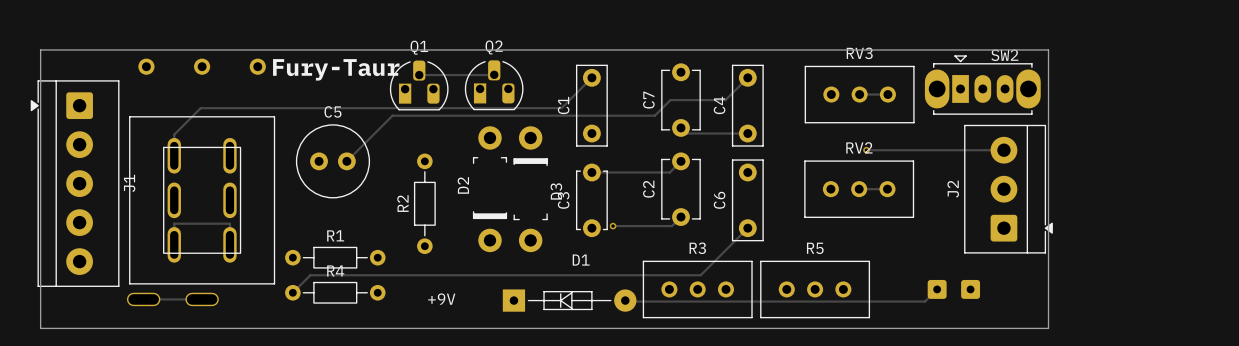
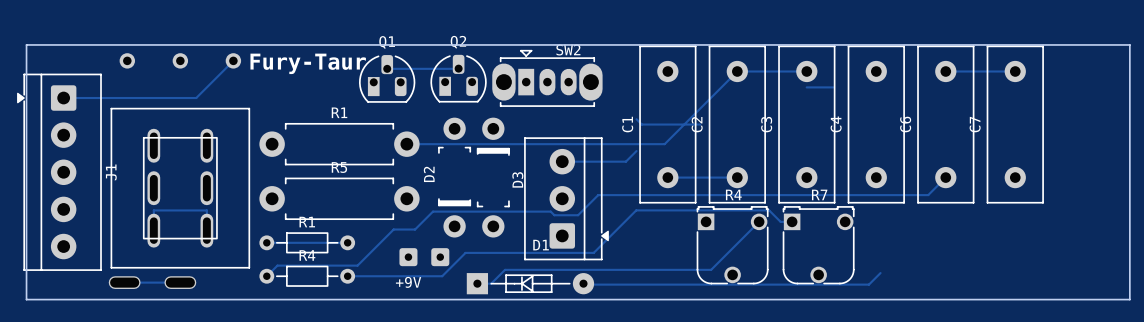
board edge: (1048, 49) (1048, 328) (40, 328) (40, 317) -> (986, 44) (1129, 44) (1129, 299) (26, 299)
C7 footprint: [661, 63, 701, 137] -> [986, 45, 1044, 204]
C1 footprint: [575, 64, 608, 147] -> [639, 45, 697, 204]
C4 footprint: [731, 64, 764, 147] -> [847, 45, 905, 204]
track: none -> (233, 60) (196, 98) (68, 98)
track: (591, 77) (561, 108) (200, 108) (174, 134) (174, 155) -> none
track: (747, 77) (725, 100) (670, 100) (654, 115) (392, 115) (346, 161) -> none
track: none -> (806, 71) (737, 71) (664, 144) (406, 144)
track: none -> (945, 71) (1015, 71)
SW2 position: (982, 85) -> (547, 78)
RV3: (859, 94) -> none
track: (866, 150) (1003, 150) -> none
via: (866, 150) -> none
C2 footprint: [661, 152, 701, 226] -> [708, 45, 766, 204]
R1: none -> (339, 144)
C6 footprint: [731, 159, 764, 242] -> [917, 45, 975, 204]
C5: (332, 161) -> none
C3 footprint: [575, 163, 608, 238] -> [778, 45, 836, 204]
track: none -> (667, 177) (737, 177)
track: (859, 189) (887, 189) -> none
RV2: (859, 189) -> none
J2: (1008, 189) -> none
R2: (424, 203) -> none
part: none -> (566, 198)
track: (681, 217) (671, 226) (613, 226) -> none
via: (613, 226) -> none
track: (747, 228) (700, 275) (310, 275) (304, 281) -> (945, 177) (928, 195) (598, 195) (578, 215) (554, 215) (550, 211) (432, 211) (415, 229) (393, 229) (357, 265) (277, 265)
track: none -> (759, 221) (711, 269) (505, 269) (491, 283) (477, 283)
track: none -> (792, 221) (780, 221) (769, 210) (636, 210) (593, 252) (465, 252) (442, 276) (347, 276)
track: none -> (266, 242) (347, 242)
R5 footprint: [760, 260, 871, 319] -> [259, 177, 420, 220]
R4: none -> (732, 245)
R7: none -> (818, 245)
part: none -> (408, 257)
part: none -> (440, 257)
R3: (697, 289) -> none
part: (937, 289) -> none
part: (970, 289) -> none

